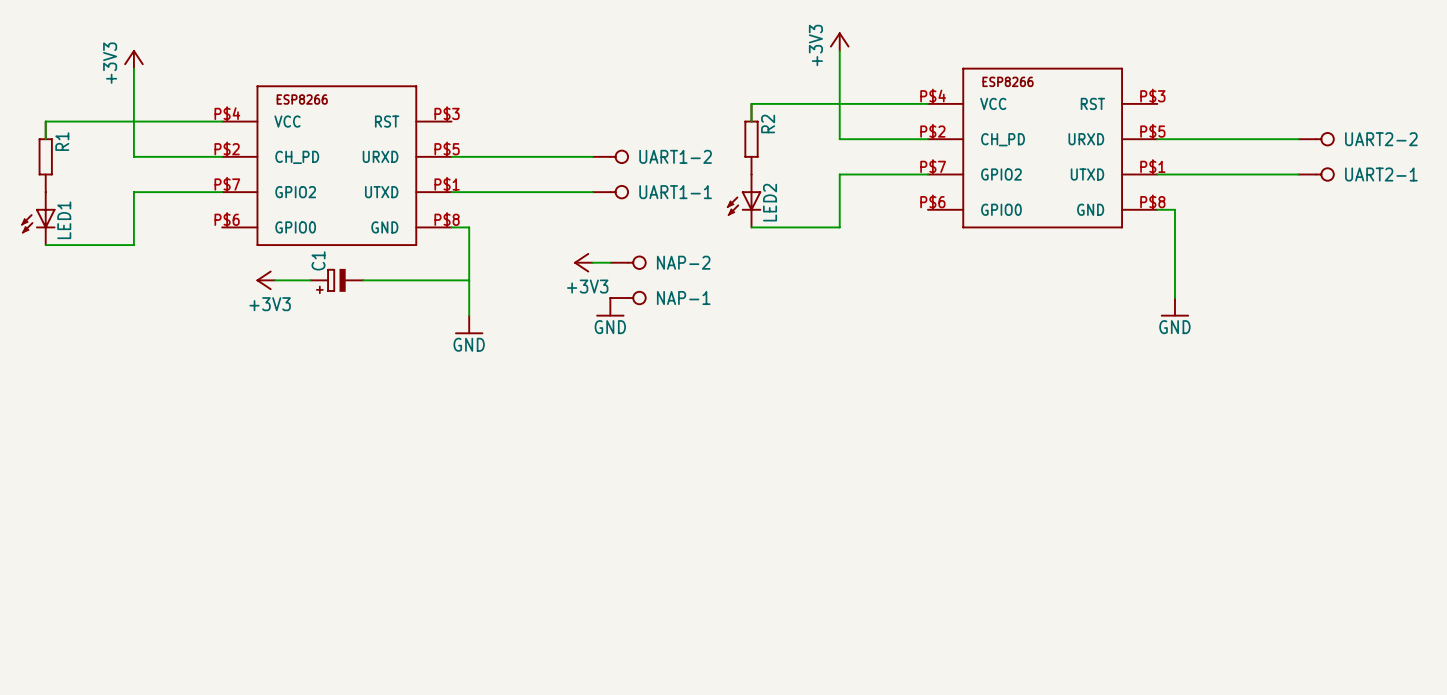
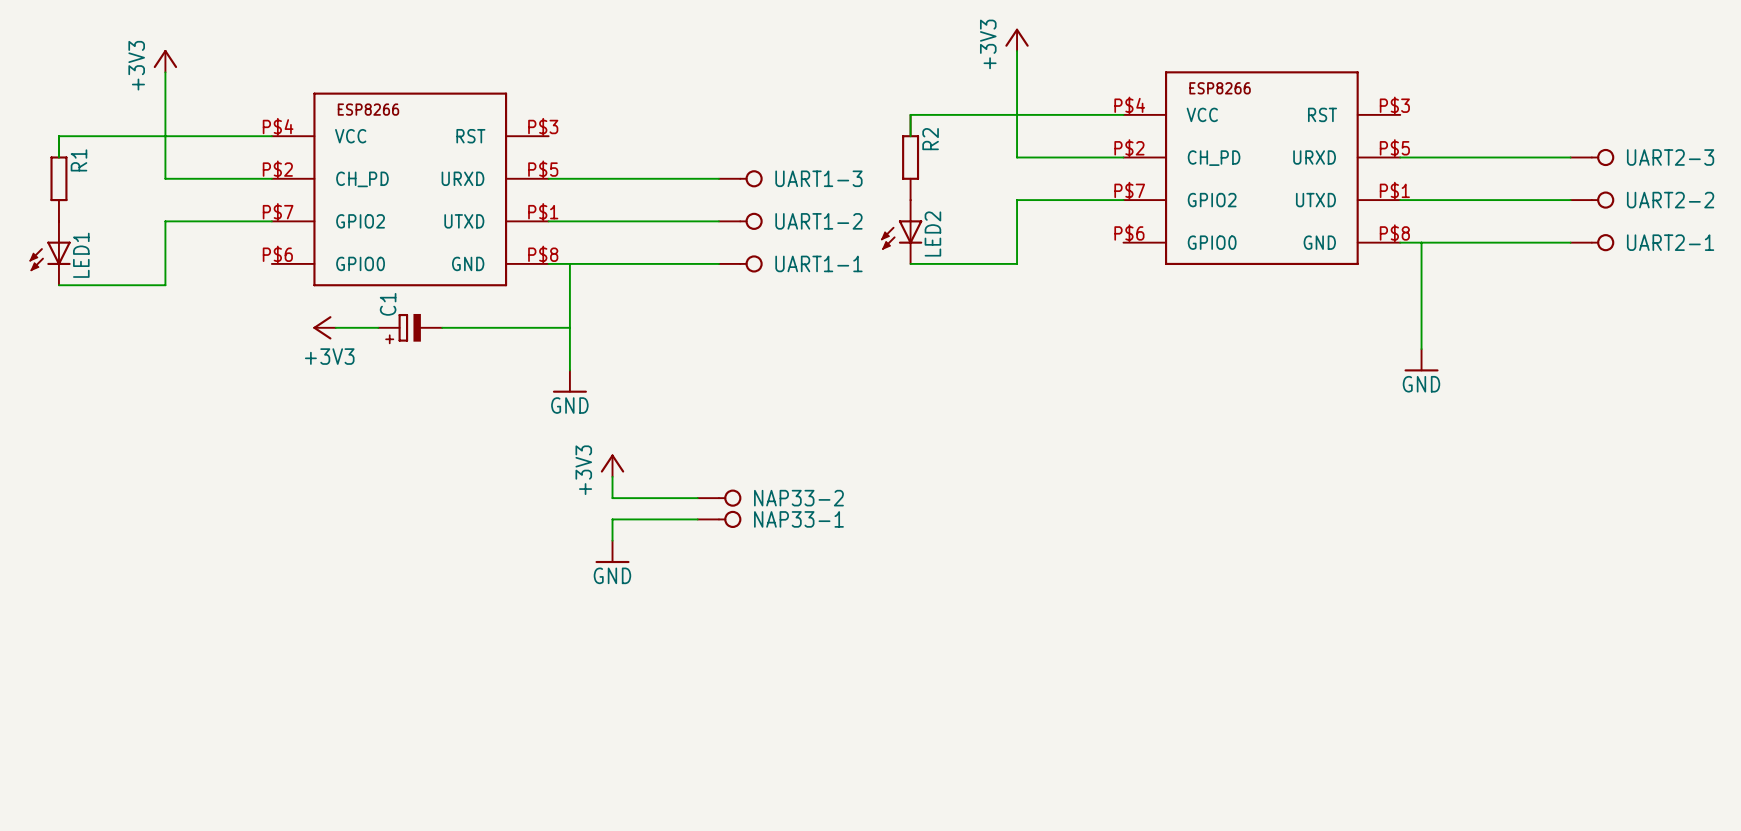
UART2-2 name: UART2-2 (1381, 139) -> UART2-3 (1670, 157)
UART1-2 name: UART1-2 (675, 156) -> UART1-3 (818, 178)
UART2-1 name: UART2-1 (1381, 174) -> UART2-2 (1670, 200)
UART1-1 name: UART1-1 (675, 192) -> UART1-2 (818, 221)
wire: none -> (1421, 242) (1570, 242)
UART2-1: none -> (1592, 242)
wire: none -> (569, 263) (718, 263)
UART1-1: none -> (740, 263)
power symbol rotation: 0° (581, 262) -> 90° clockwise (612, 463)
power symbol position: +3V3 (583, 262) -> +3V3 (612, 465)
wire: (592, 262) (610, 262) -> none
NAP-2: (628, 262) -> none
NAP-1: (628, 298) -> none
power symbol: GND (610, 307) -> none
wire: none -> (612, 476) (612, 498) (697, 498)
NAP33-2: none -> (719, 498)
wire: none -> (697, 519) (612, 519) (612, 540)
NAP33-1: none -> (719, 519)
power symbol: none -> GND (612, 551)

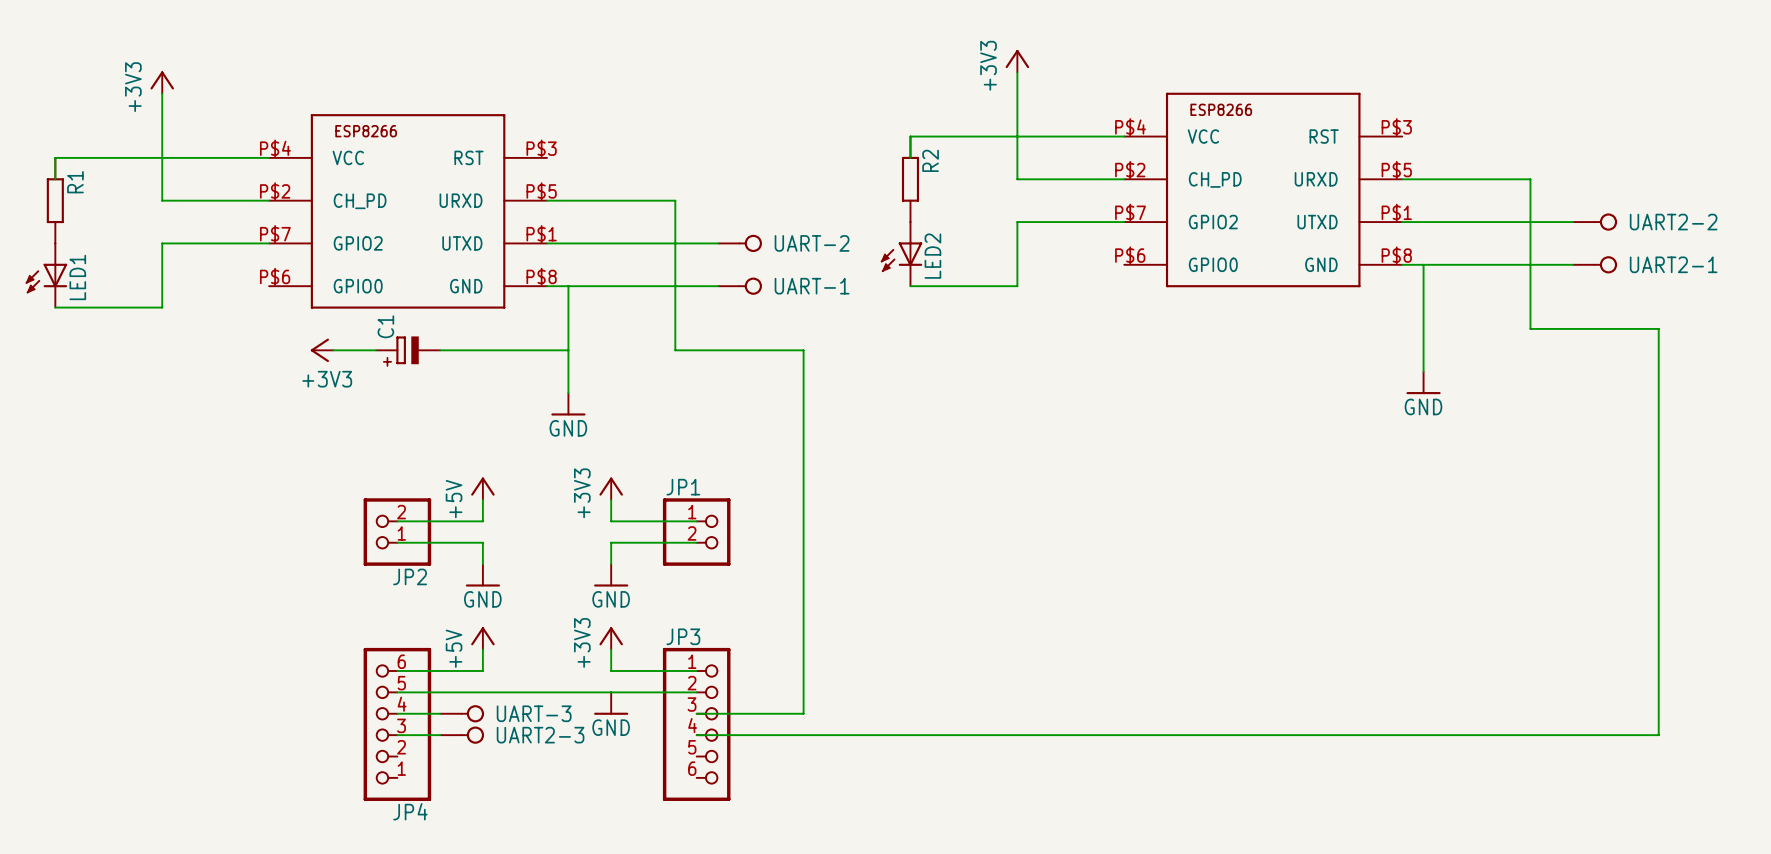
wire: (1527, 157) (1570, 157) -> (1530, 179) (1530, 328) (1658, 328) (1658, 735) (696, 735)
UART2-3 position: (1592, 157) -> (462, 735)
wire: (676, 178) (718, 178) -> (675, 200) (675, 350) (803, 350) (803, 713) (696, 713)
UART1-3: (740, 178) -> none
UART1-2 name: UART1-2 (818, 221) -> UART-2 (812, 243)
UART1-1 name: UART1-1 (818, 263) -> UART-1 (812, 286)
power symbol: none -> +5V (482, 488)
wire: none -> (482, 499) (482, 521) (397, 521)
NAP33-2: (719, 498) -> none
JP2: none -> (397, 532)
JP1: none -> (696, 532)
wire: none -> (397, 542) (482, 542) (482, 564)
NAP33-1: (719, 519) -> none
power symbol: none -> GND (482, 575)
power symbol: none -> +5V (482, 638)
power symbol: none -> +3V3 (611, 638)
wire: none -> (482, 649) (482, 671) (397, 671)
wire: none -> (611, 649) (611, 671) (696, 671)
wire: none -> (397, 692) (696, 692)
power symbol: none -> GND (611, 703)
wire: none -> (397, 713) (440, 713)
UART-3: none -> (462, 713)
JP4: none -> (397, 724)
JP3: none -> (696, 724)
wire: none -> (397, 735) (440, 735)

